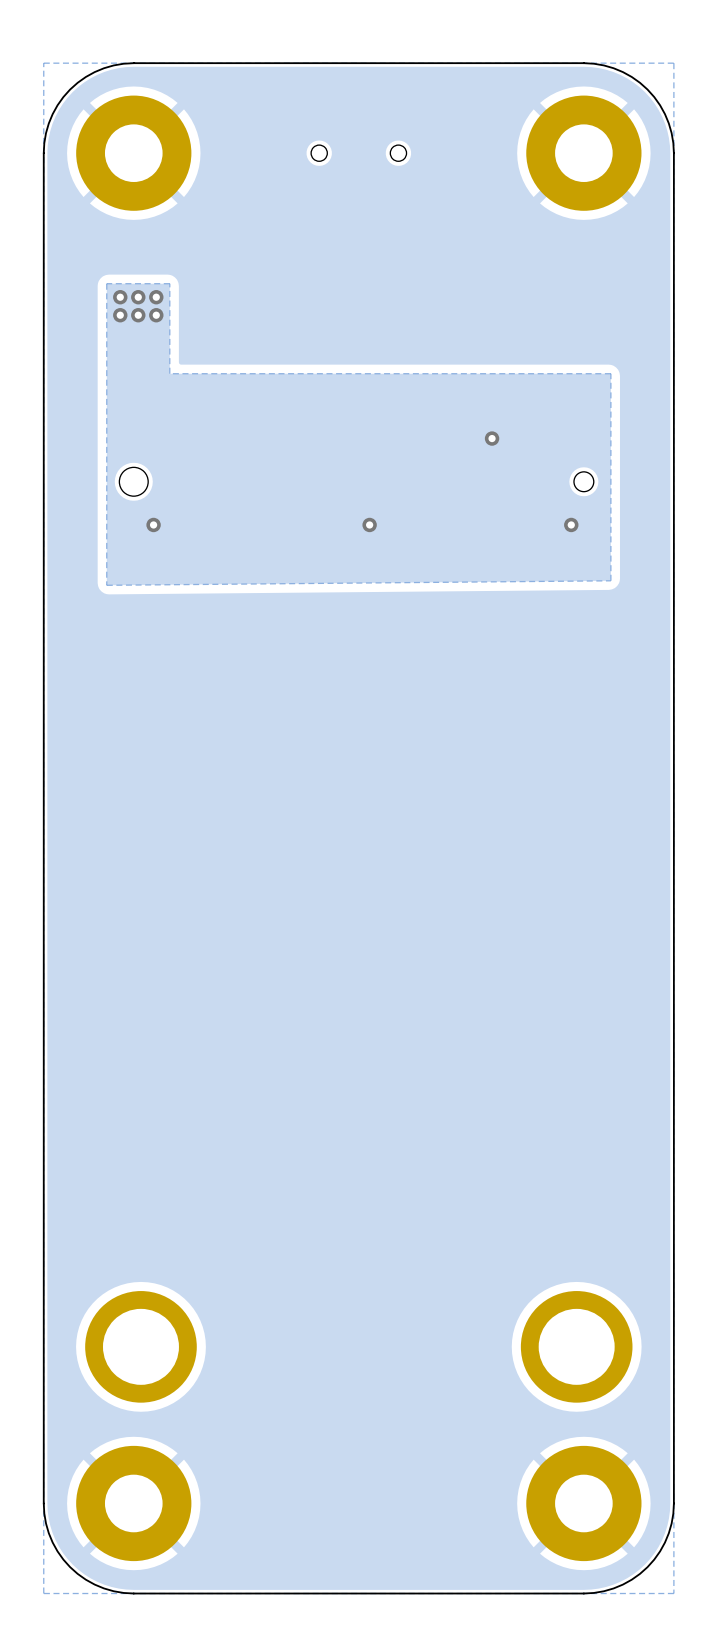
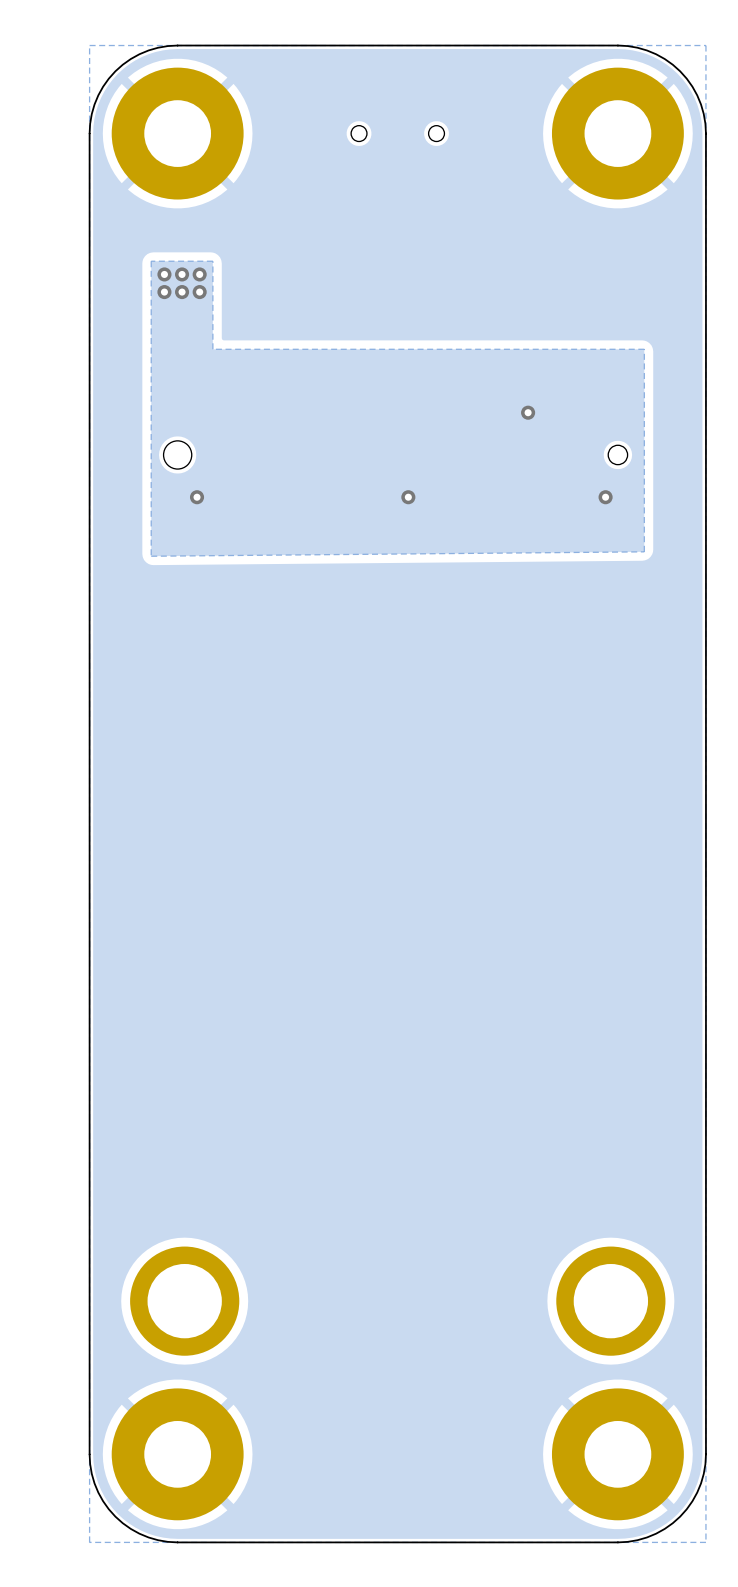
part footprint: [76, 95, 192, 211] -> [111, 67, 244, 200]
part footprint: [526, 95, 642, 211] -> [551, 67, 684, 200]
part footprint: [76, 1445, 192, 1562] -> [111, 1388, 244, 1521]
part footprint: [526, 1445, 642, 1562] -> [551, 1388, 684, 1521]

